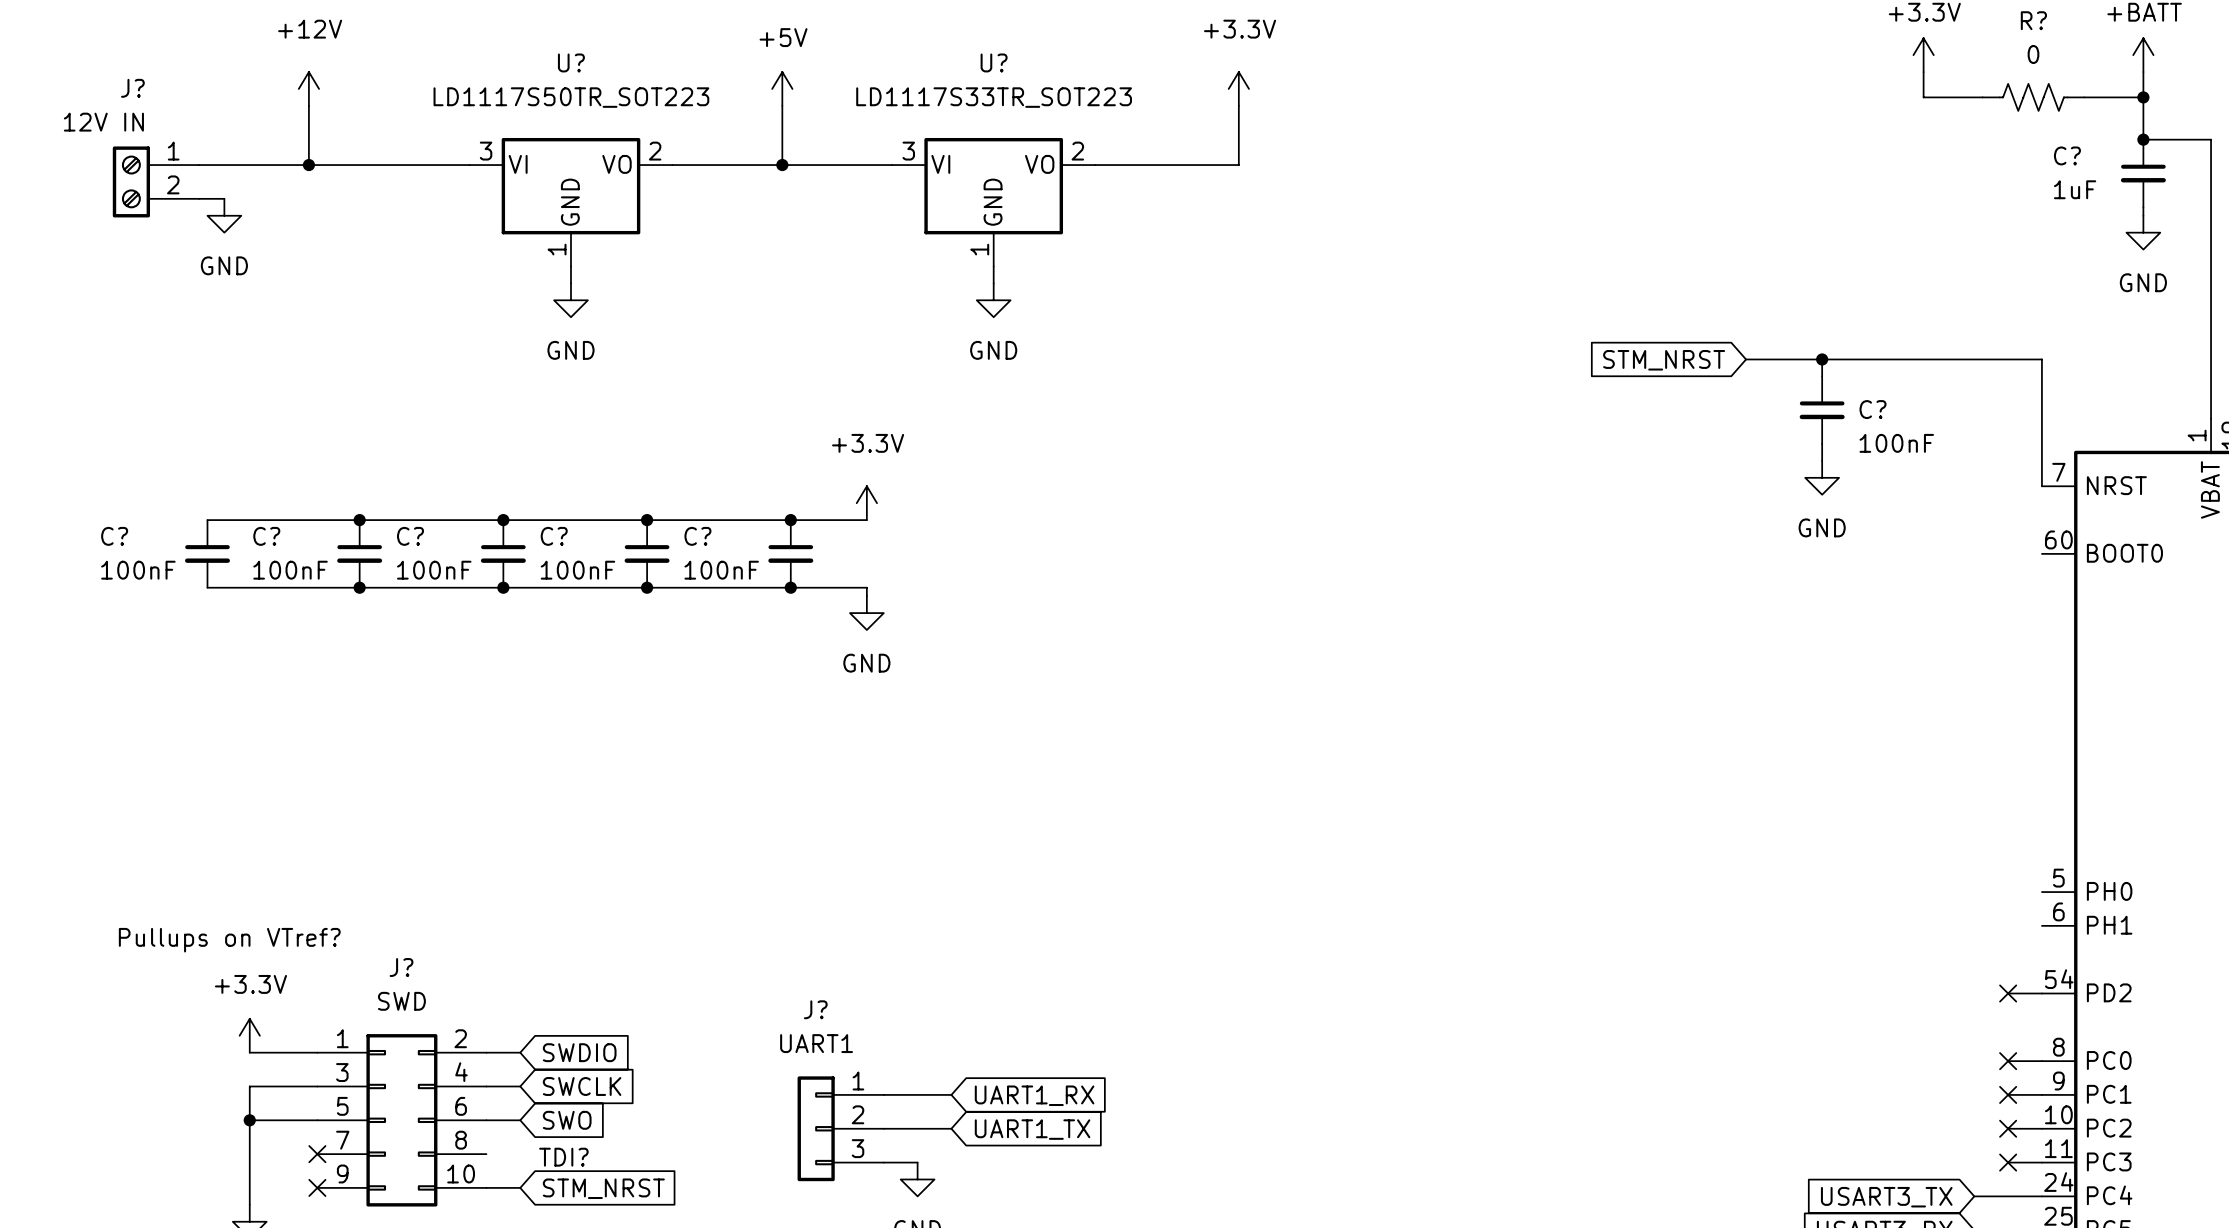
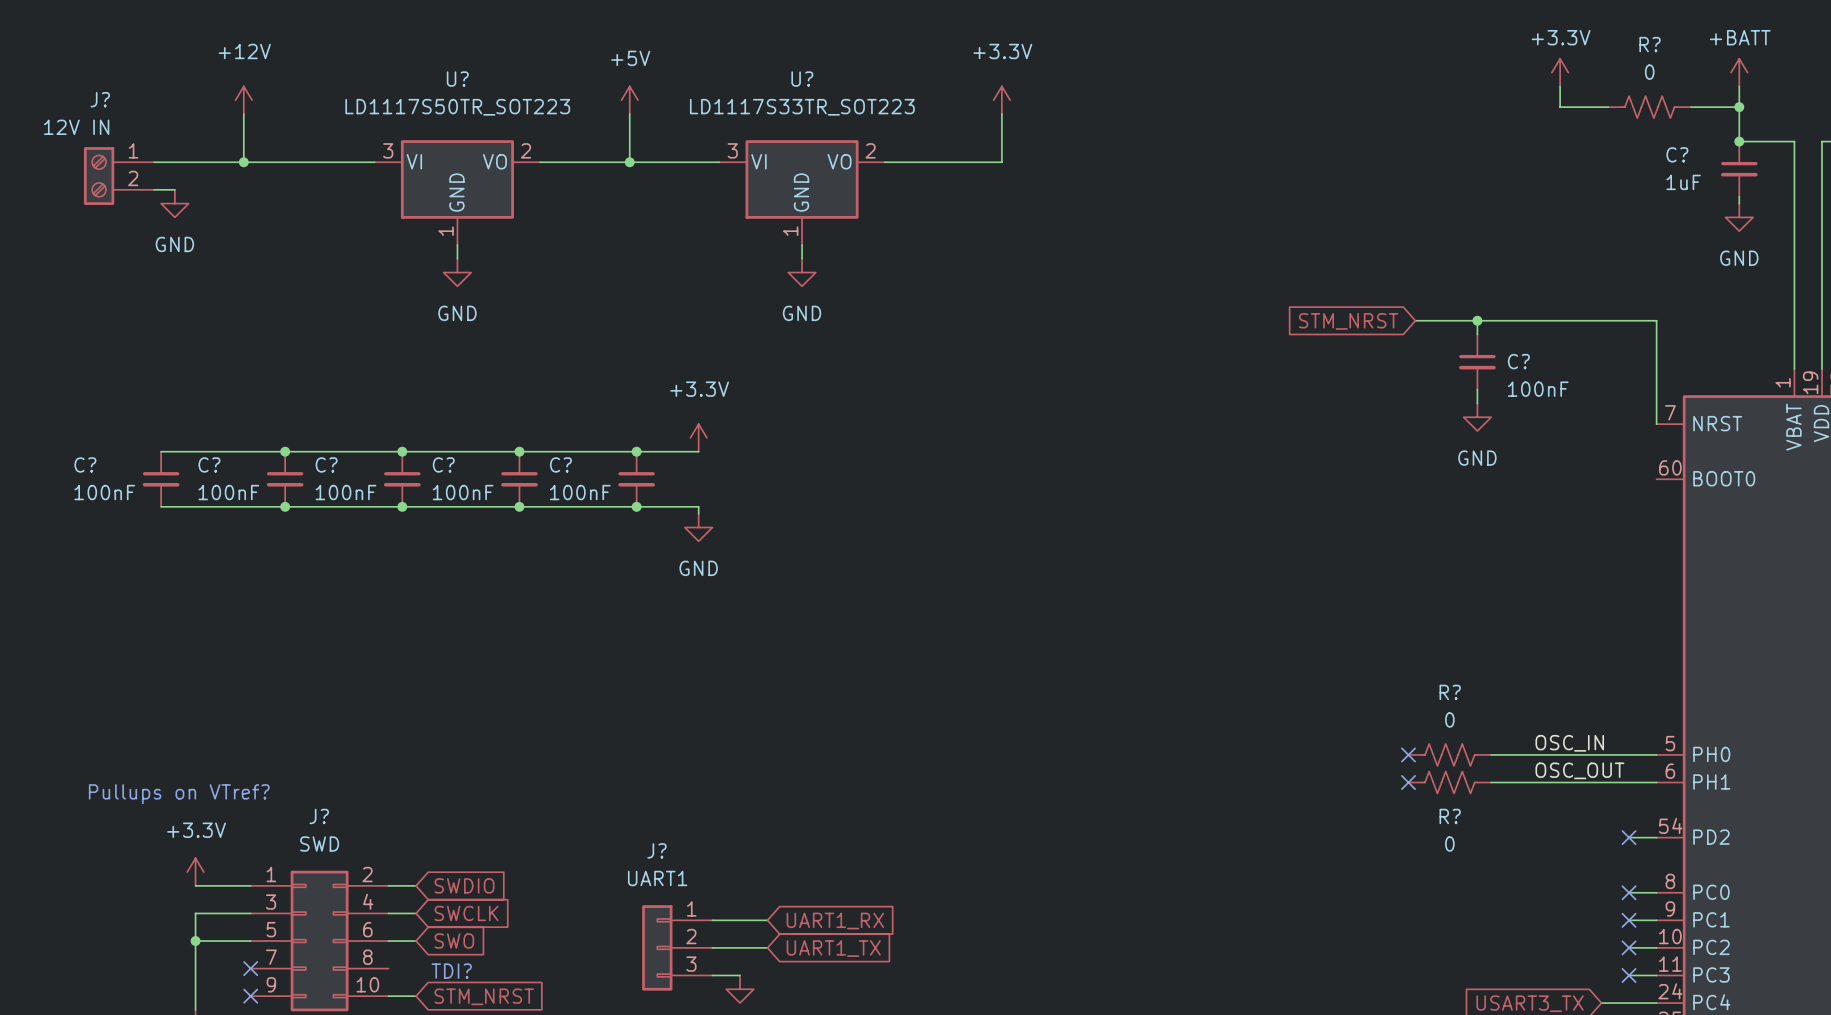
label: none -> OSC_IN (1569, 743)
no-connect mark: none -> (1408, 754)
R?: none -> 0 (1449, 754)
wire: none -> (1491, 754) (1656, 754)
label: none -> OSC_OUT (1579, 770)
no-connect mark: none -> (1408, 782)
R?: none -> 0 (1449, 782)
wire: none -> (1491, 782) (1656, 782)

